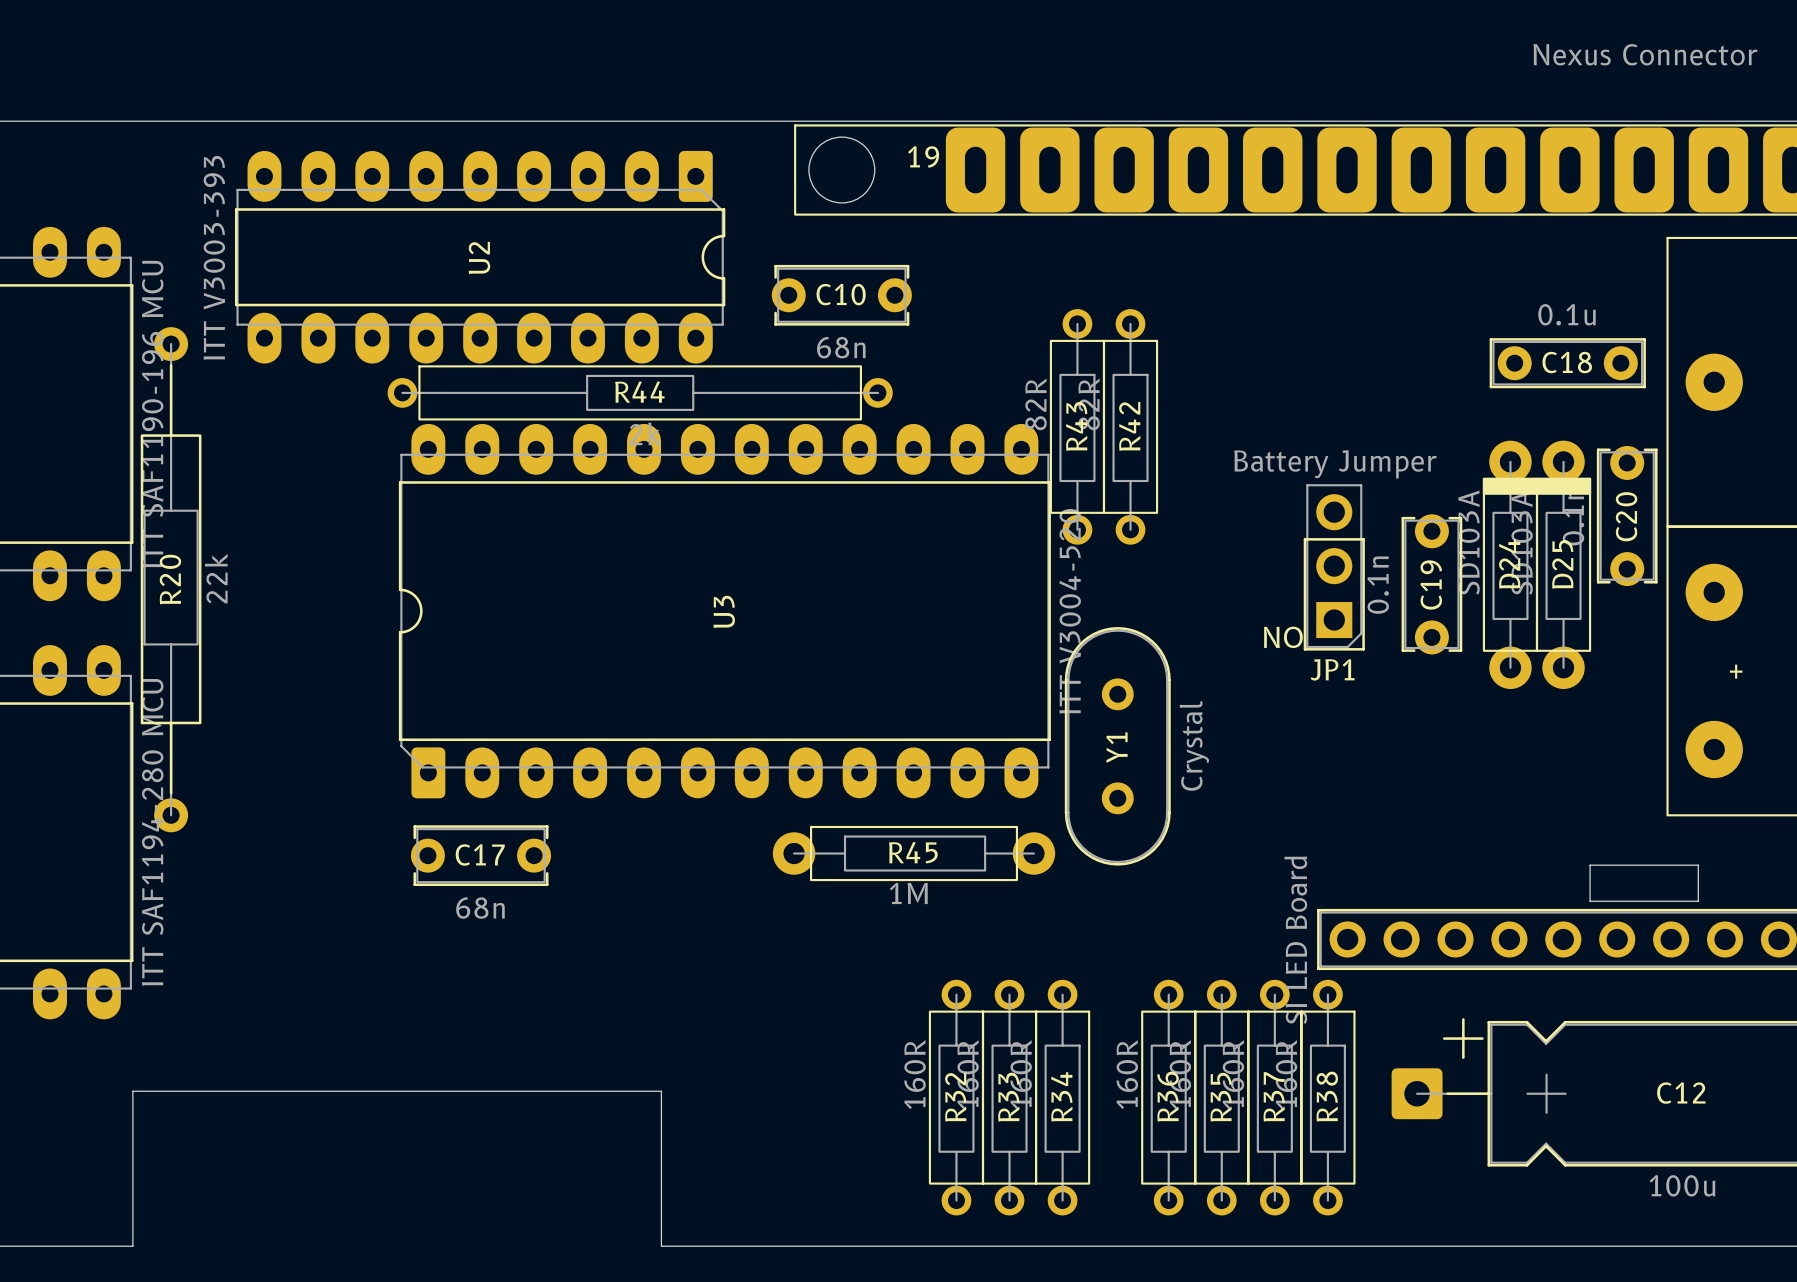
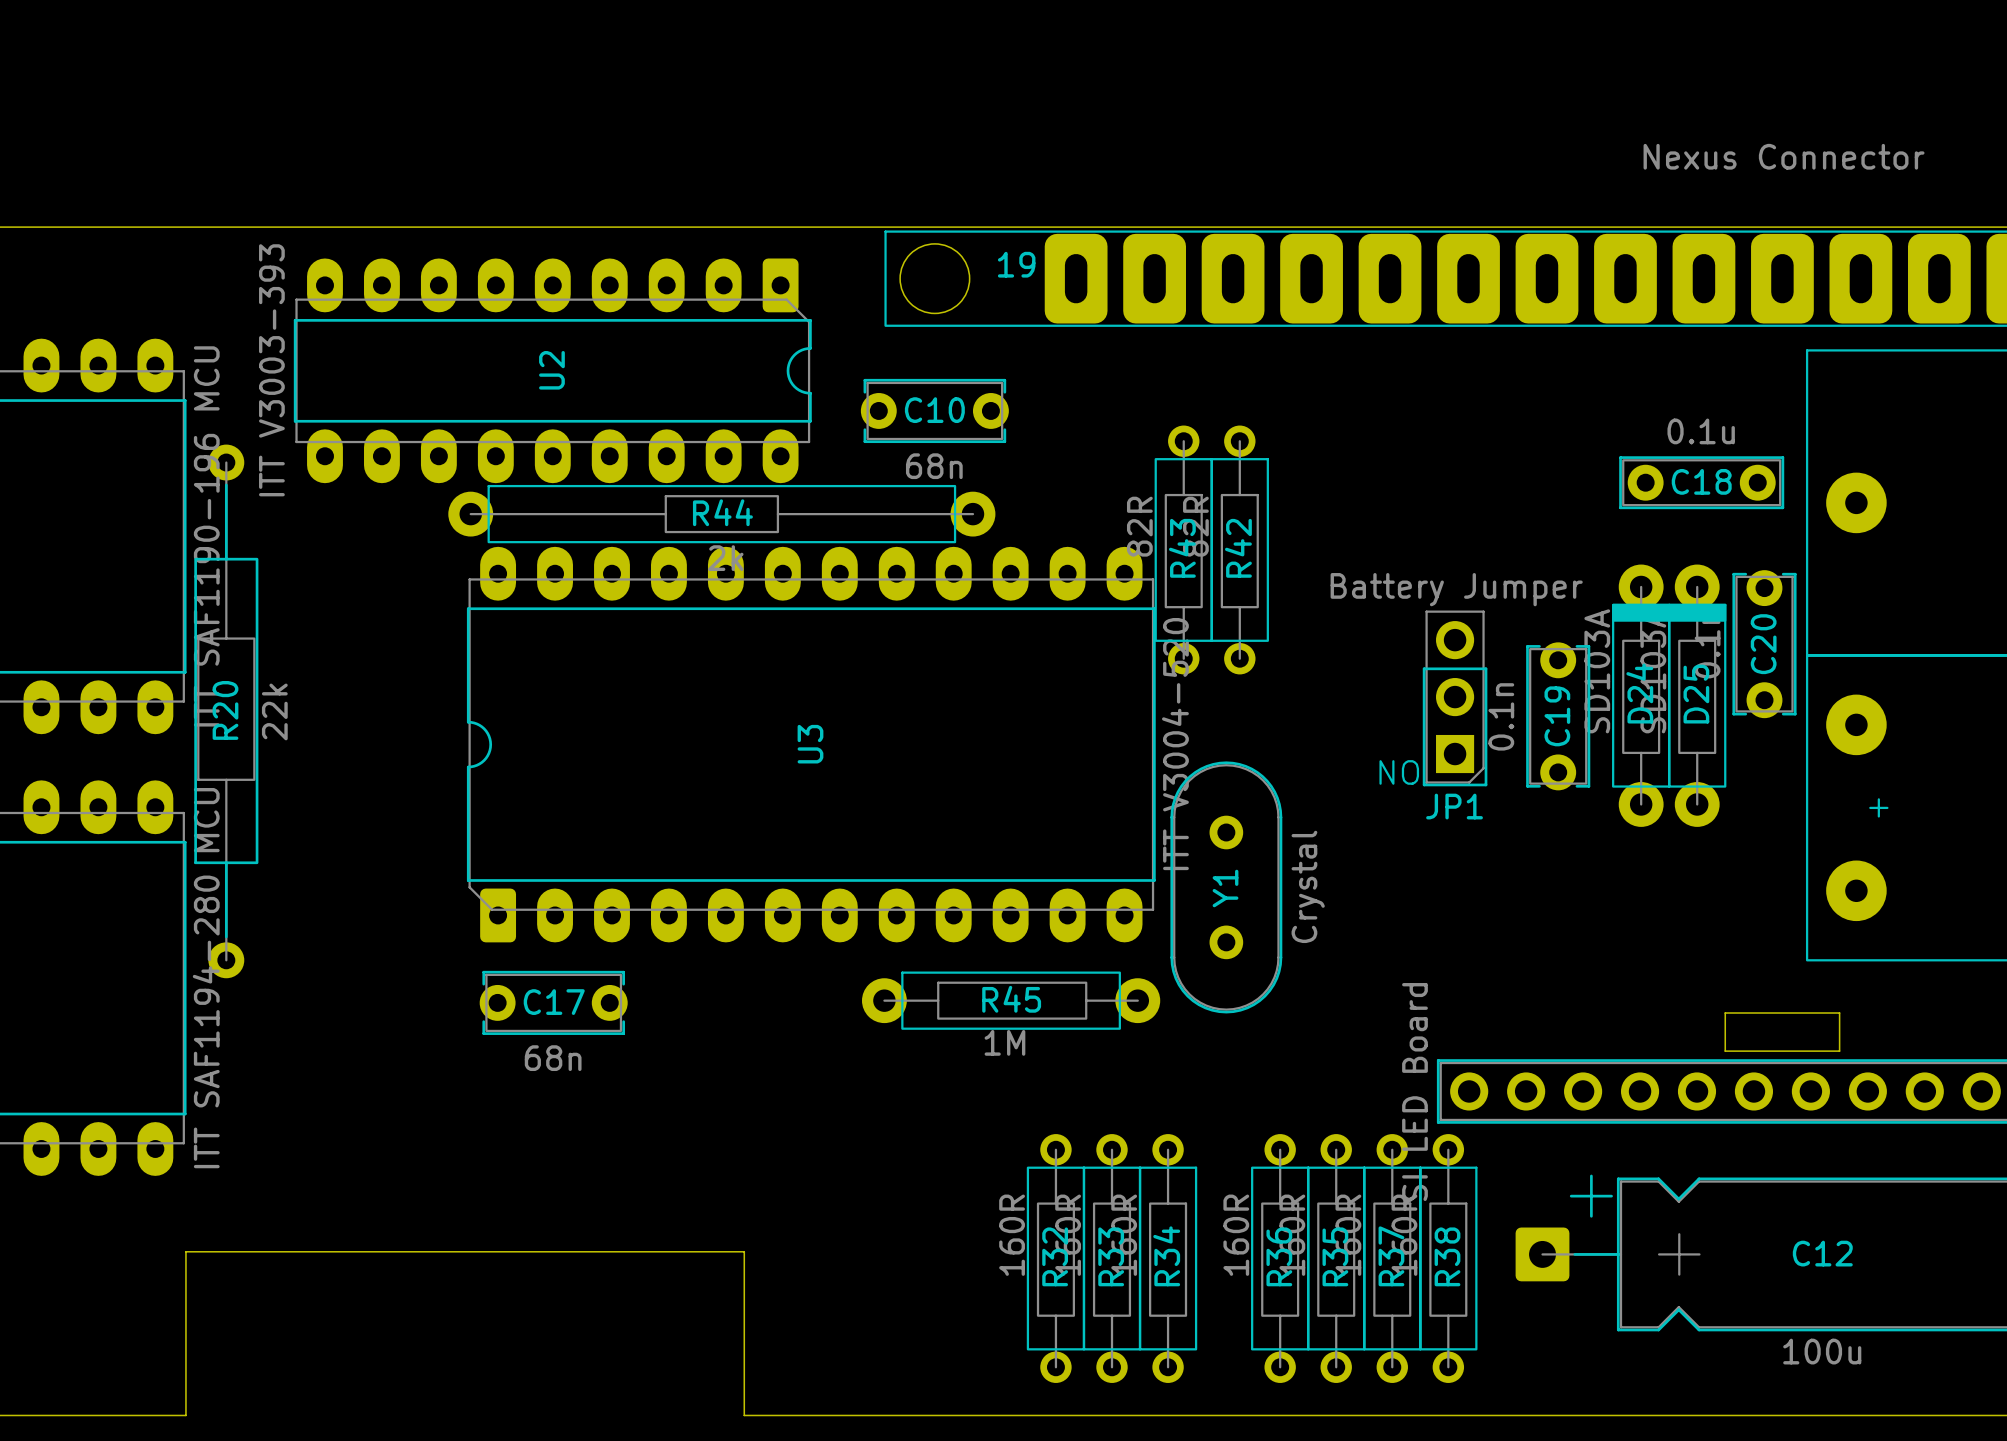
R44 footprint: [387, 365, 893, 421] -> [448, 484, 996, 544]

